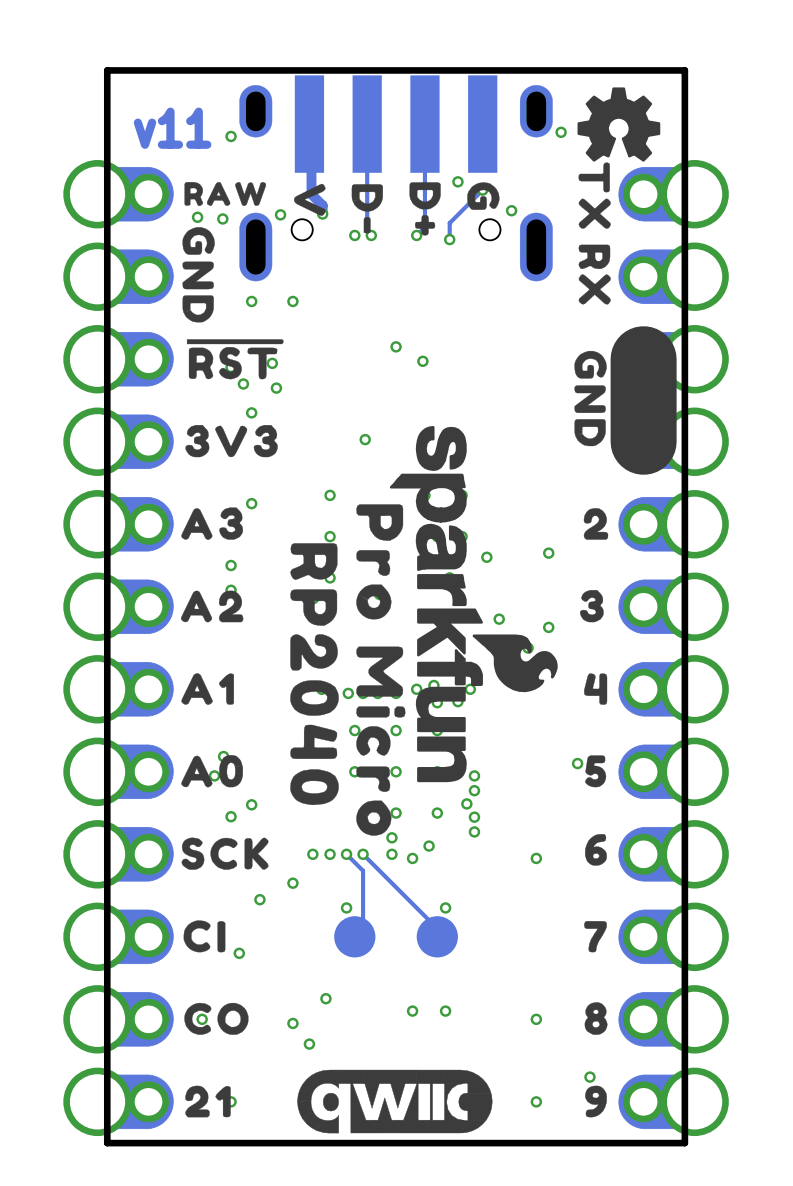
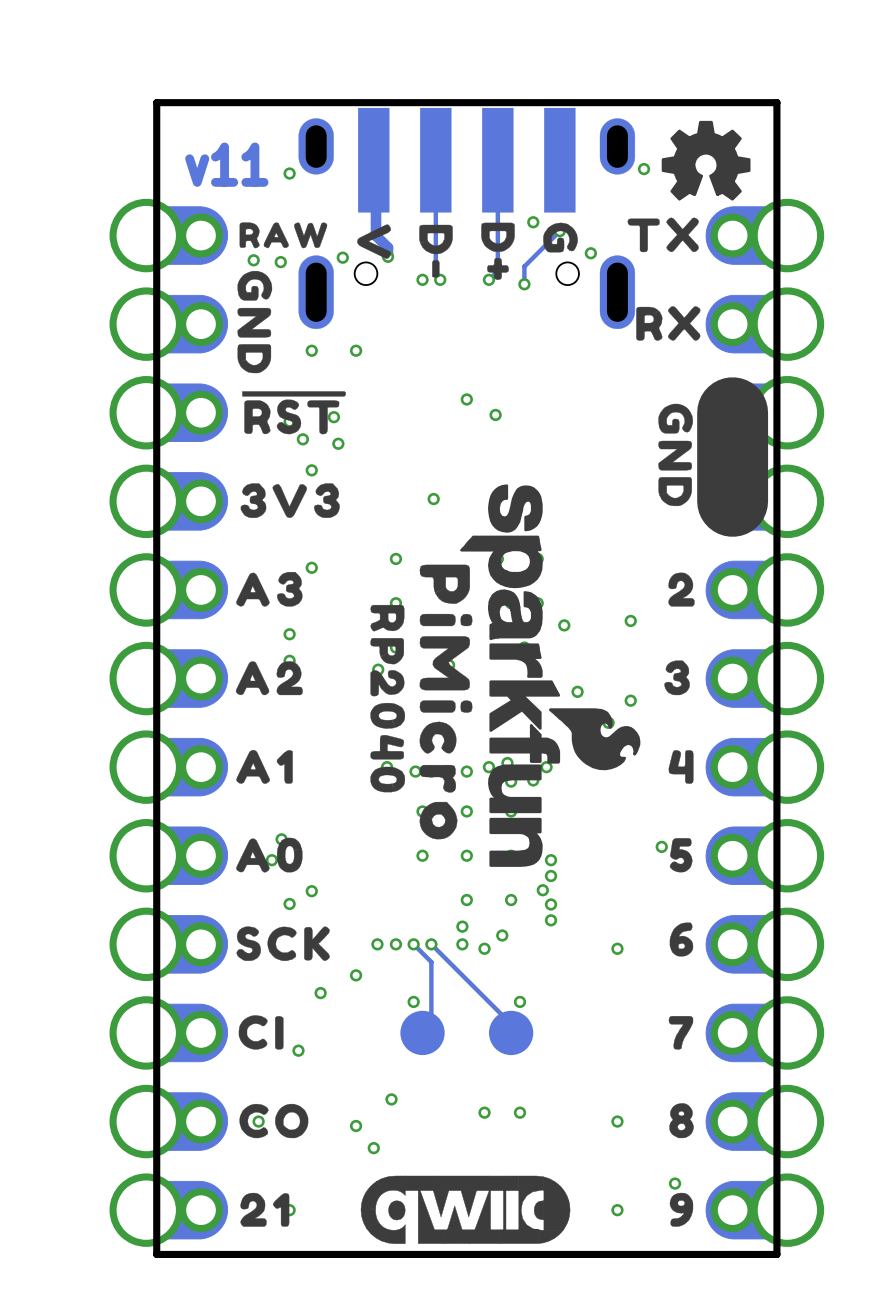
drawing shape: [578, 162, 611, 229] -> [627, 217, 699, 253]
drawing shape: [578, 244, 611, 305] -> [636, 306, 701, 341]
drawing: none -> [370, 564, 473, 840]
drawing: [290, 504, 406, 836] -> none

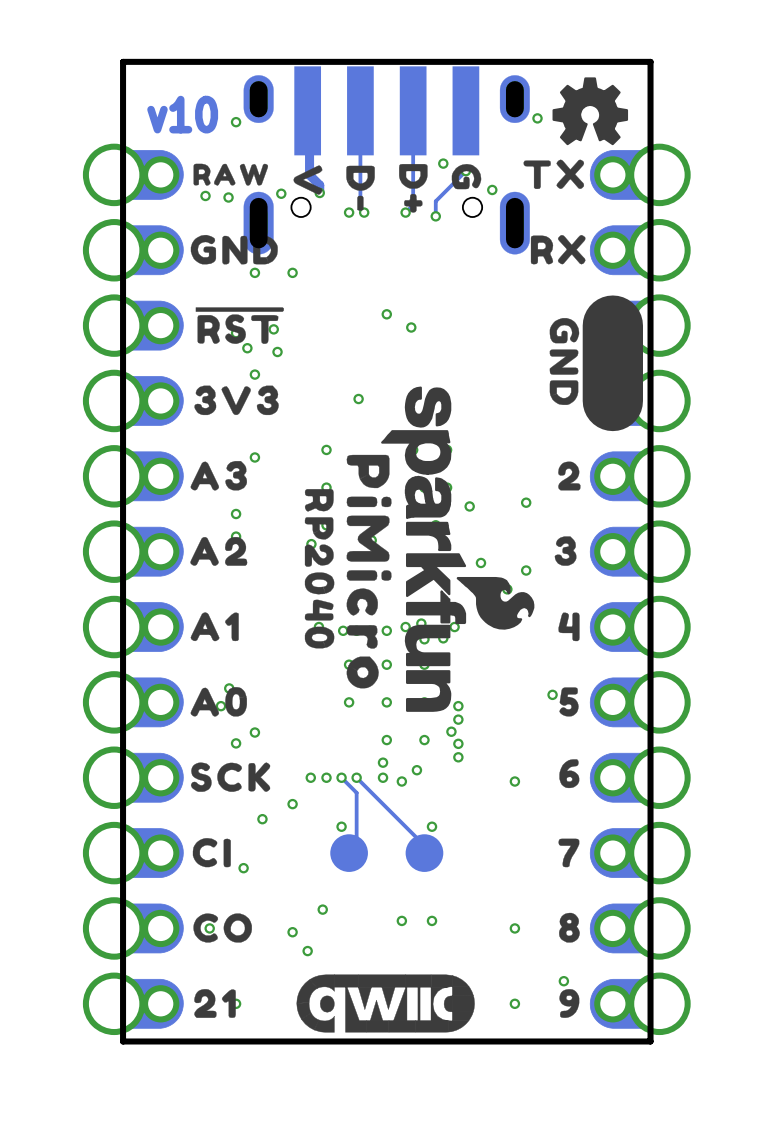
text: v11 (226, 164) -> v10 (182, 114)
drawing shape: [237, 270, 273, 374] -> [190, 234, 278, 265]

